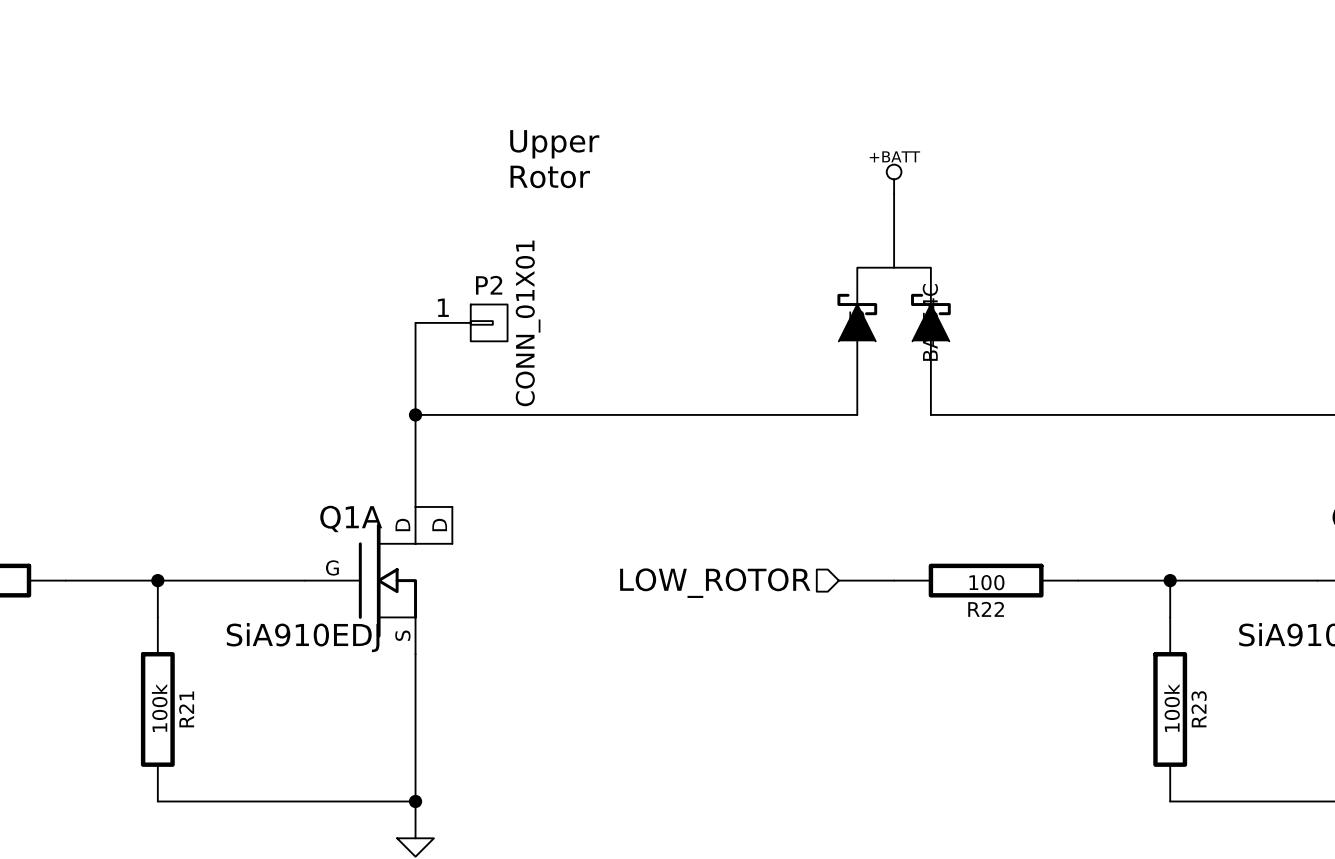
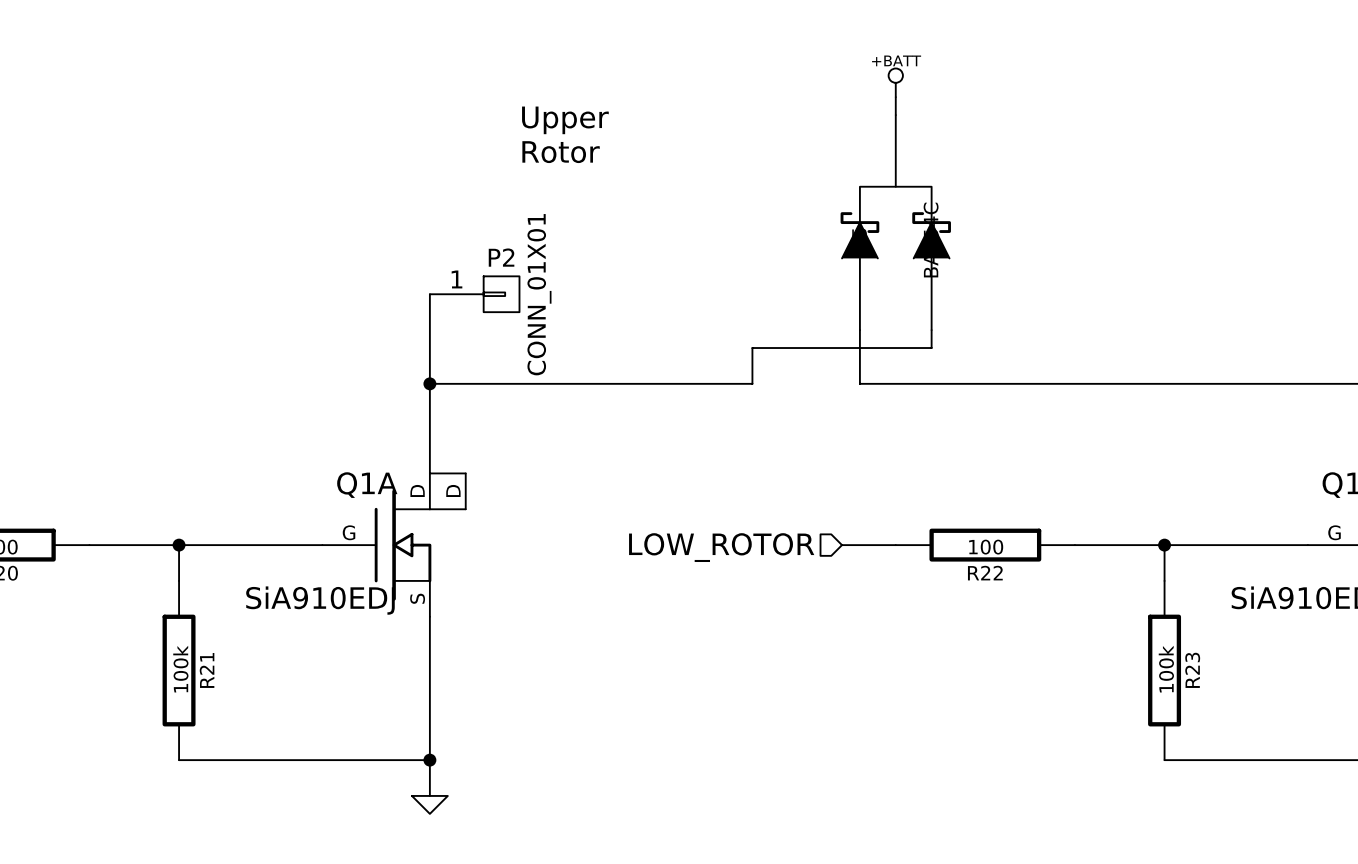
wire: none -> (895, 97) (895, 115)
power symbol position: +BATT (894, 179) -> +BATT (895, 82)
part position: (894, 304) -> (895, 222)
wire: none -> (859, 330) (859, 383) (931, 383)
wire: (746, 414) (857, 414) -> (752, 383) (752, 348) (931, 348) (931, 330)

